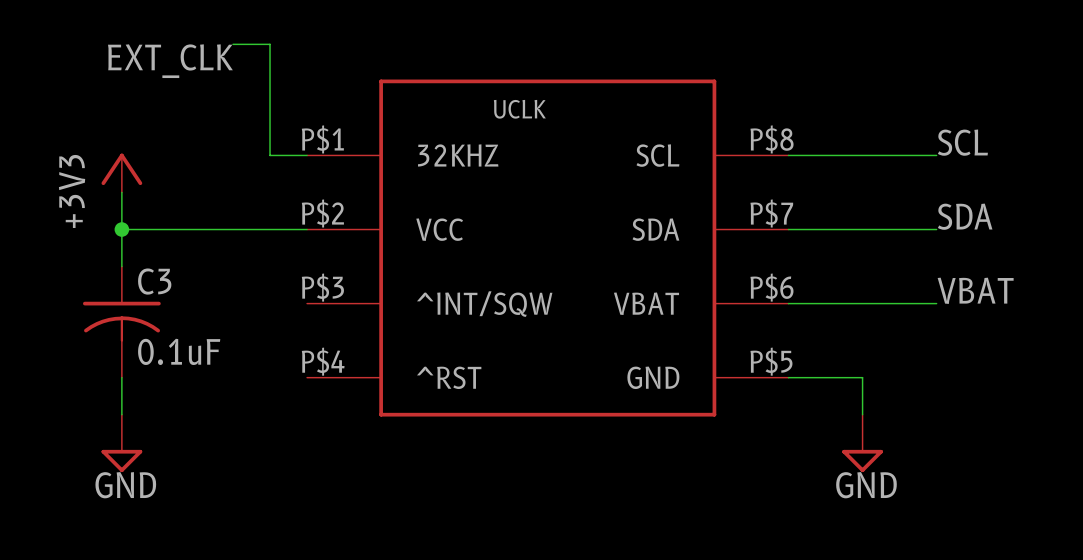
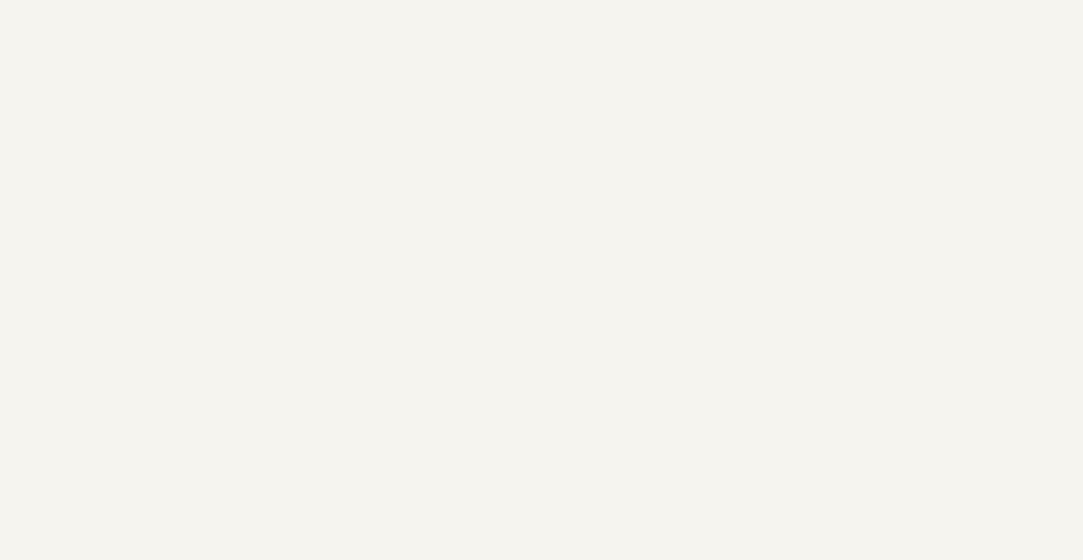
wire: (232, 44) (270, 44) (270, 155) (307, 155) -> none
label: EXT_CLK (170, 61) -> none
label: SCL (962, 142) -> none
wire: (788, 155) (936, 155) -> none
power symbol: +3V3 (121, 173) -> none
wire: (121, 192) (121, 266) -> none
label: SDA (965, 216) -> none
wire: (121, 229) (307, 229) -> none
junction: (121, 229) -> none
wire: (788, 229) (936, 229) -> none
UCLK: (547, 248) -> none
label: VBAT (975, 290) -> none
wire: (788, 303) (936, 303) -> none
C3: 0.1uF (121, 322) -> none
wire: (121, 377) (121, 414) -> none
wire: (788, 377) (862, 377) (862, 414) -> none
power symbol: GND (121, 443) -> none
power symbol: GND (862, 443) -> none

